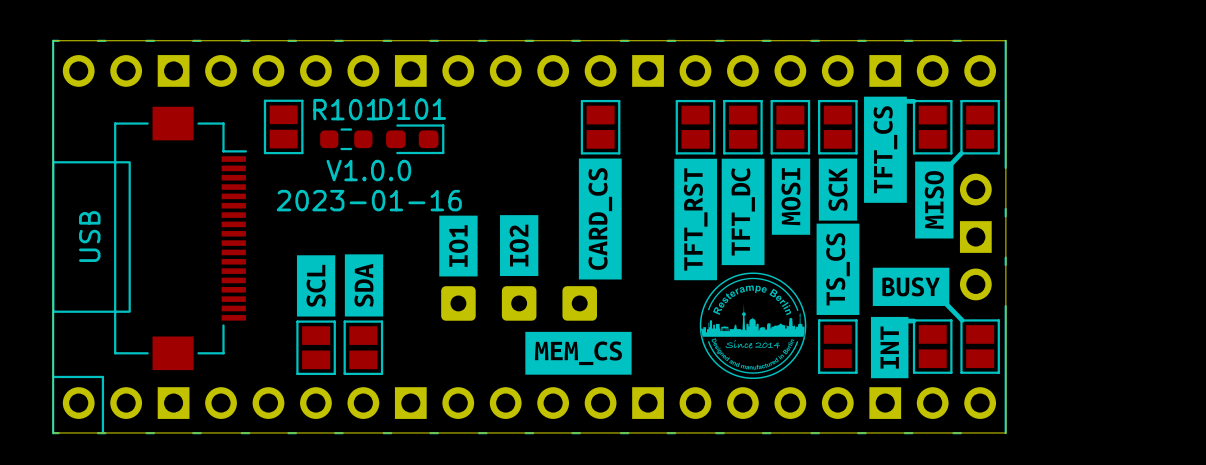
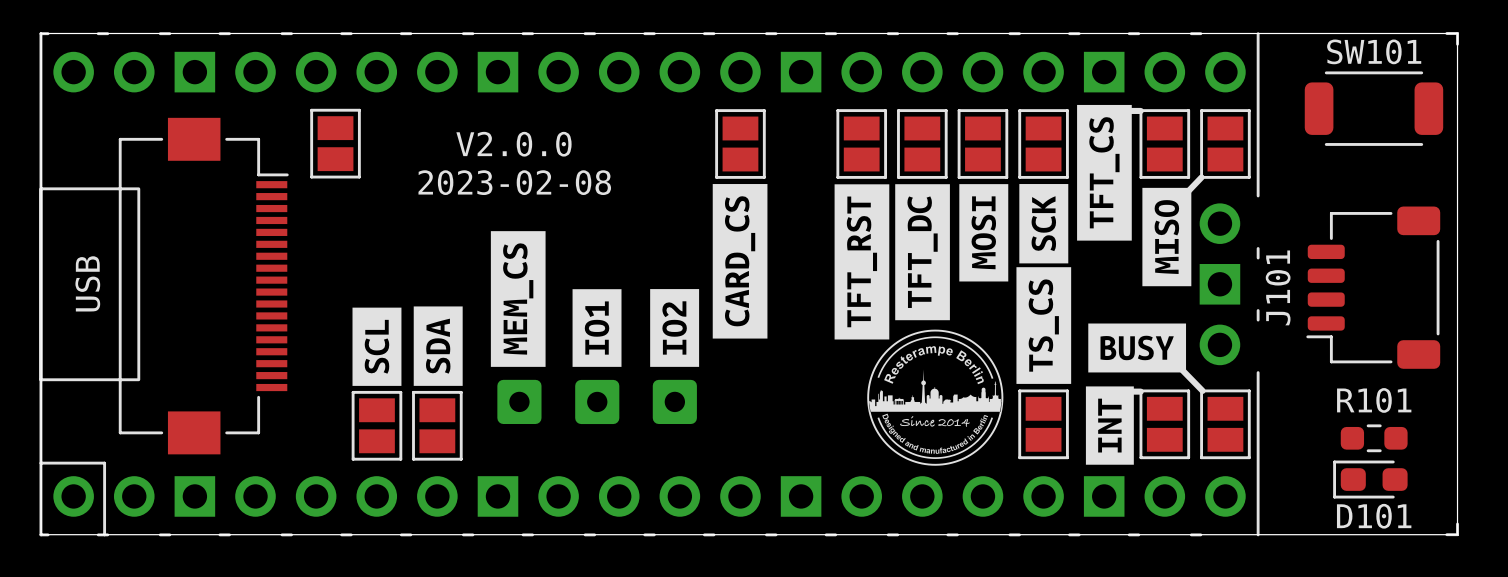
board edge: (1005, 40) (1005, 432) -> (1258, 33) (1457, 33) (1457, 534) (1258, 534)
line: none -> (1446, 33) (1457, 33) (1457, 44)
SW101: none -> (1373, 108)
text: none -> V2.0.0 (513, 144)
R101 position: (346, 139) -> (1374, 438)
D101 rotation: 0° (415, 139) -> 180° (1370, 479)
D101 position: (415, 139) -> (1370, 479)
text: none -> 2023-02-08 (514, 182)
text: V1.0.0 (368, 170) -> none
drawing: none -> [490, 231, 546, 367]
text: 2023-01-16 (369, 200) -> none
J101: none -> (1373, 287)
drawing position: (519, 245) -> (674, 327)
drawing position: (458, 246) -> (597, 328)
part: (458, 303) -> none
part: (519, 303) -> none
part: (579, 303) -> none
part: none -> (519, 401)
part: none -> (597, 401)
part: none -> (674, 401)
drawing: [525, 331, 632, 375] -> none
line: none -> (1457, 523) (1457, 534) (1446, 534)

